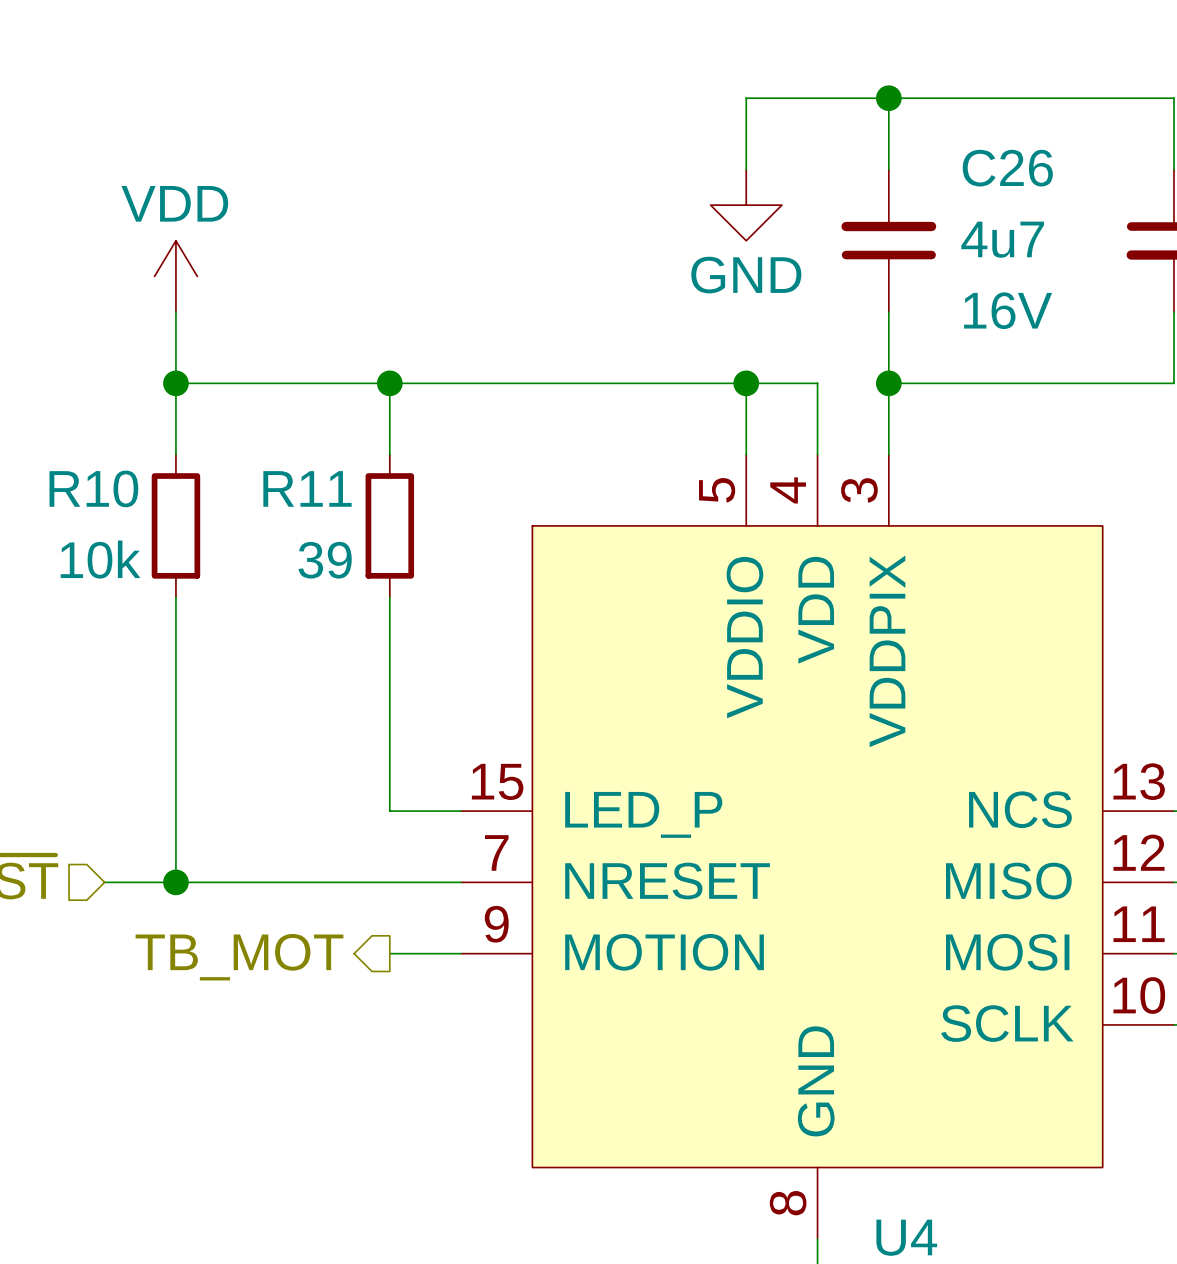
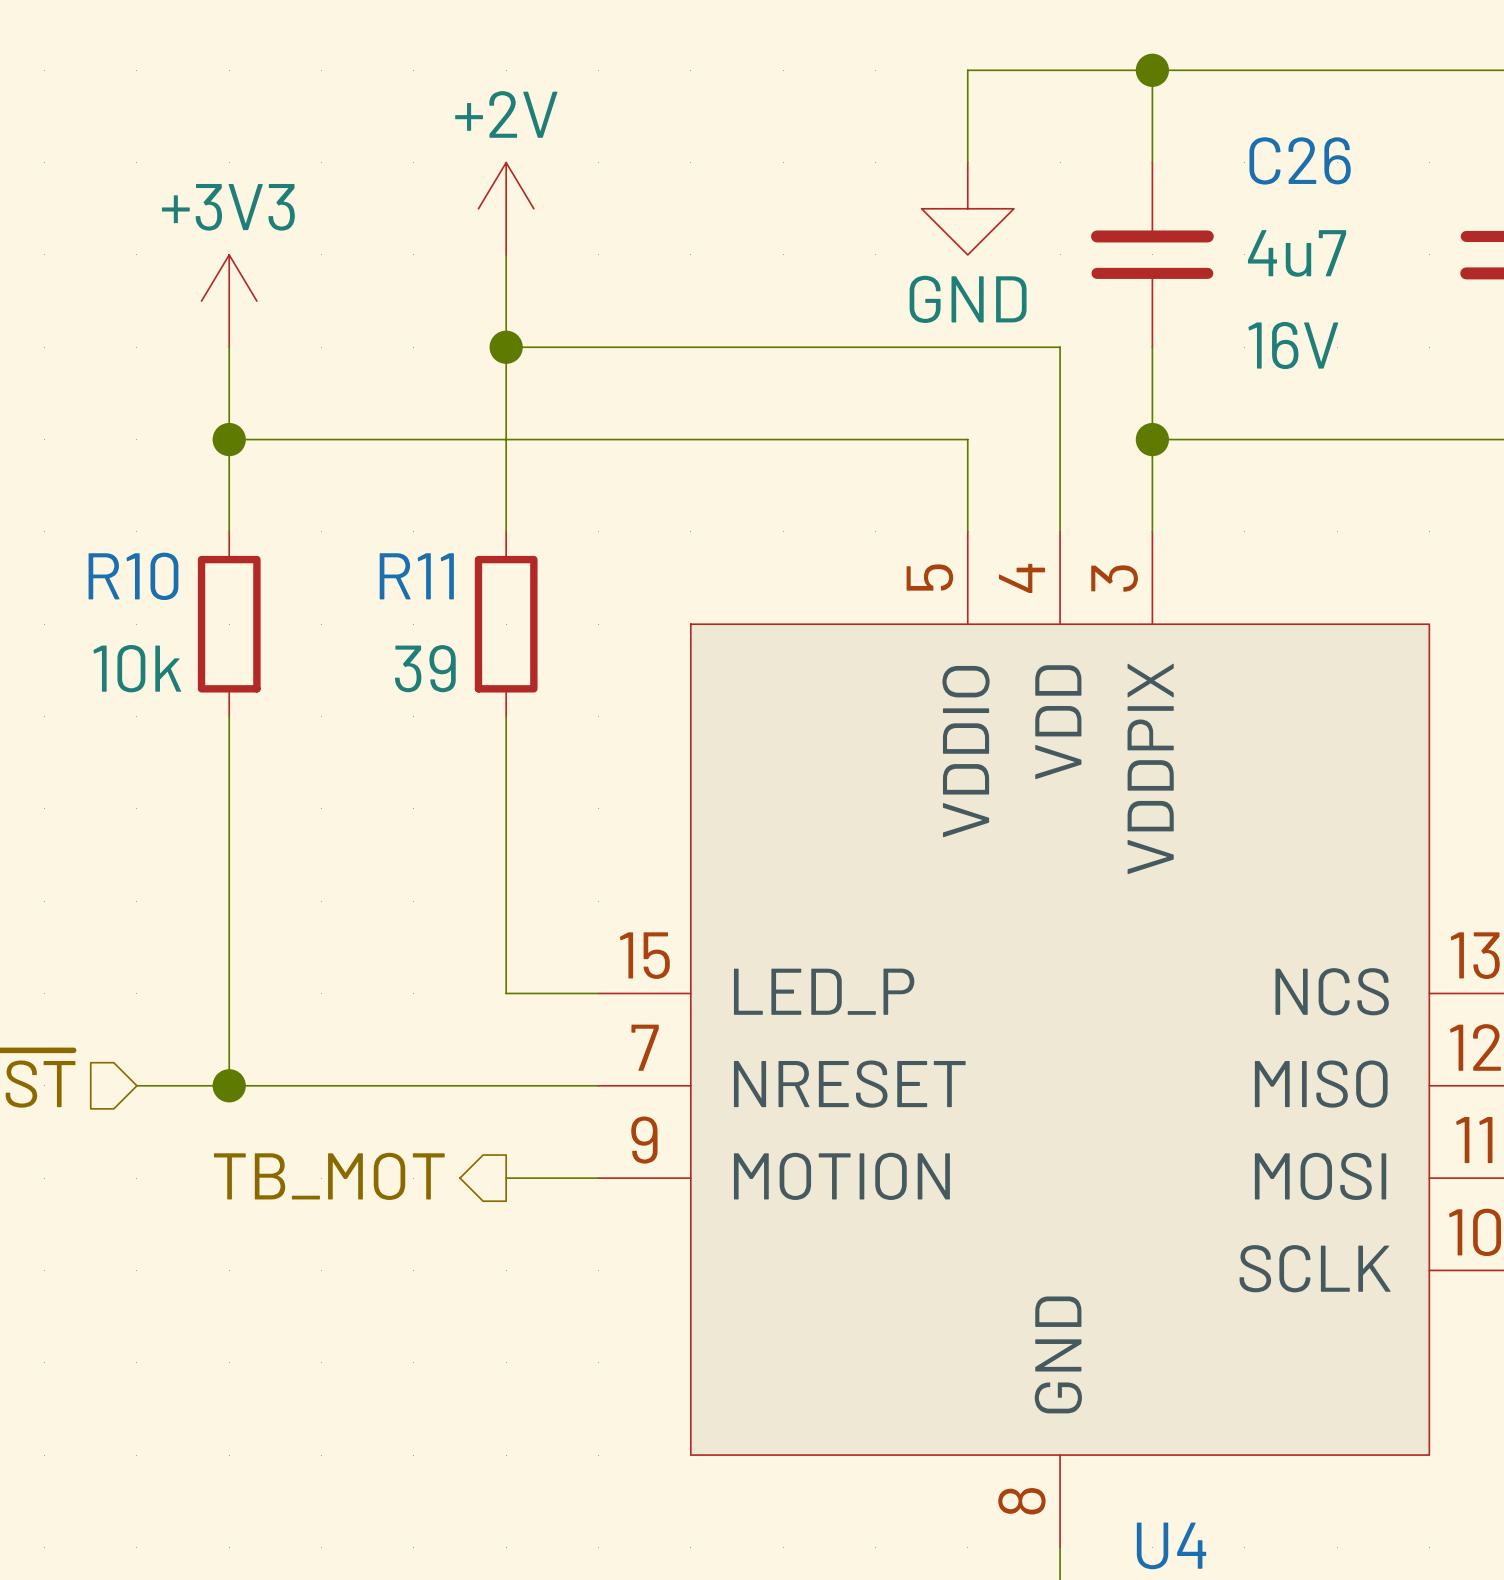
power symbol: none -> +2V (506, 208)
wire: none -> (506, 254) (506, 439)
power symbol: VDD (175, 276) -> +3V3 (229, 301)
junction position: (389, 383) -> (506, 347)
wire: (746, 383) (817, 383) -> (506, 347) (1060, 347) (1060, 439)
junction: (746, 383) -> none

